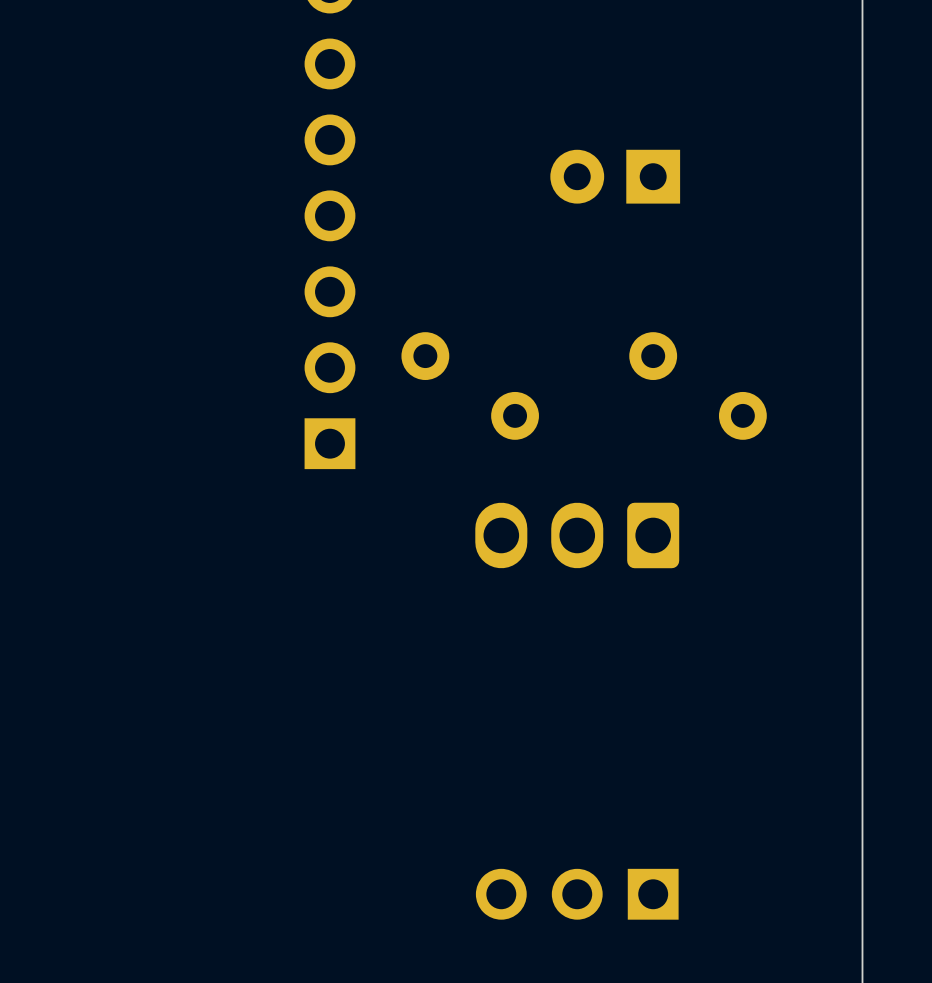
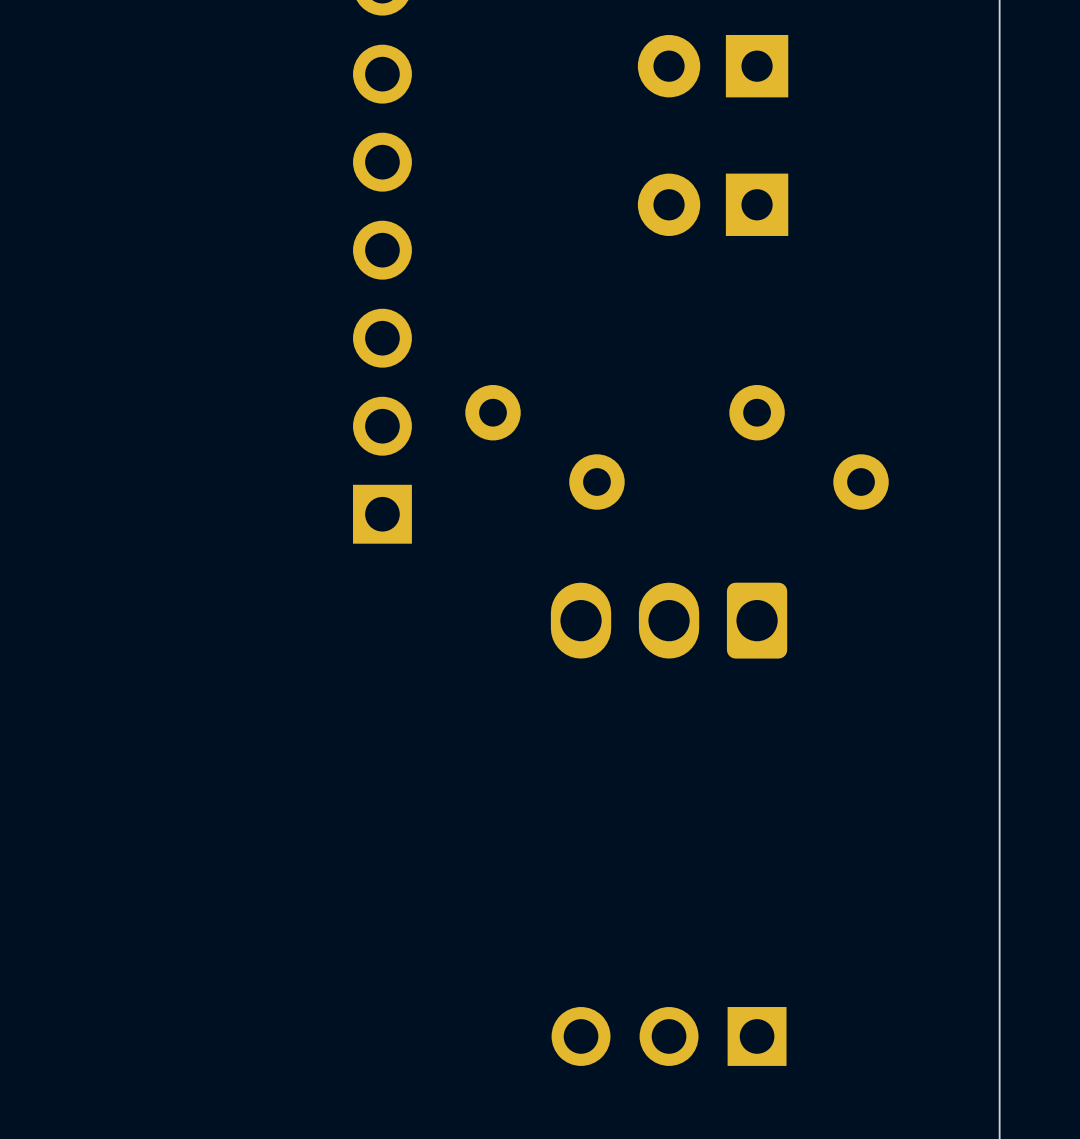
part: none -> (713, 66)

